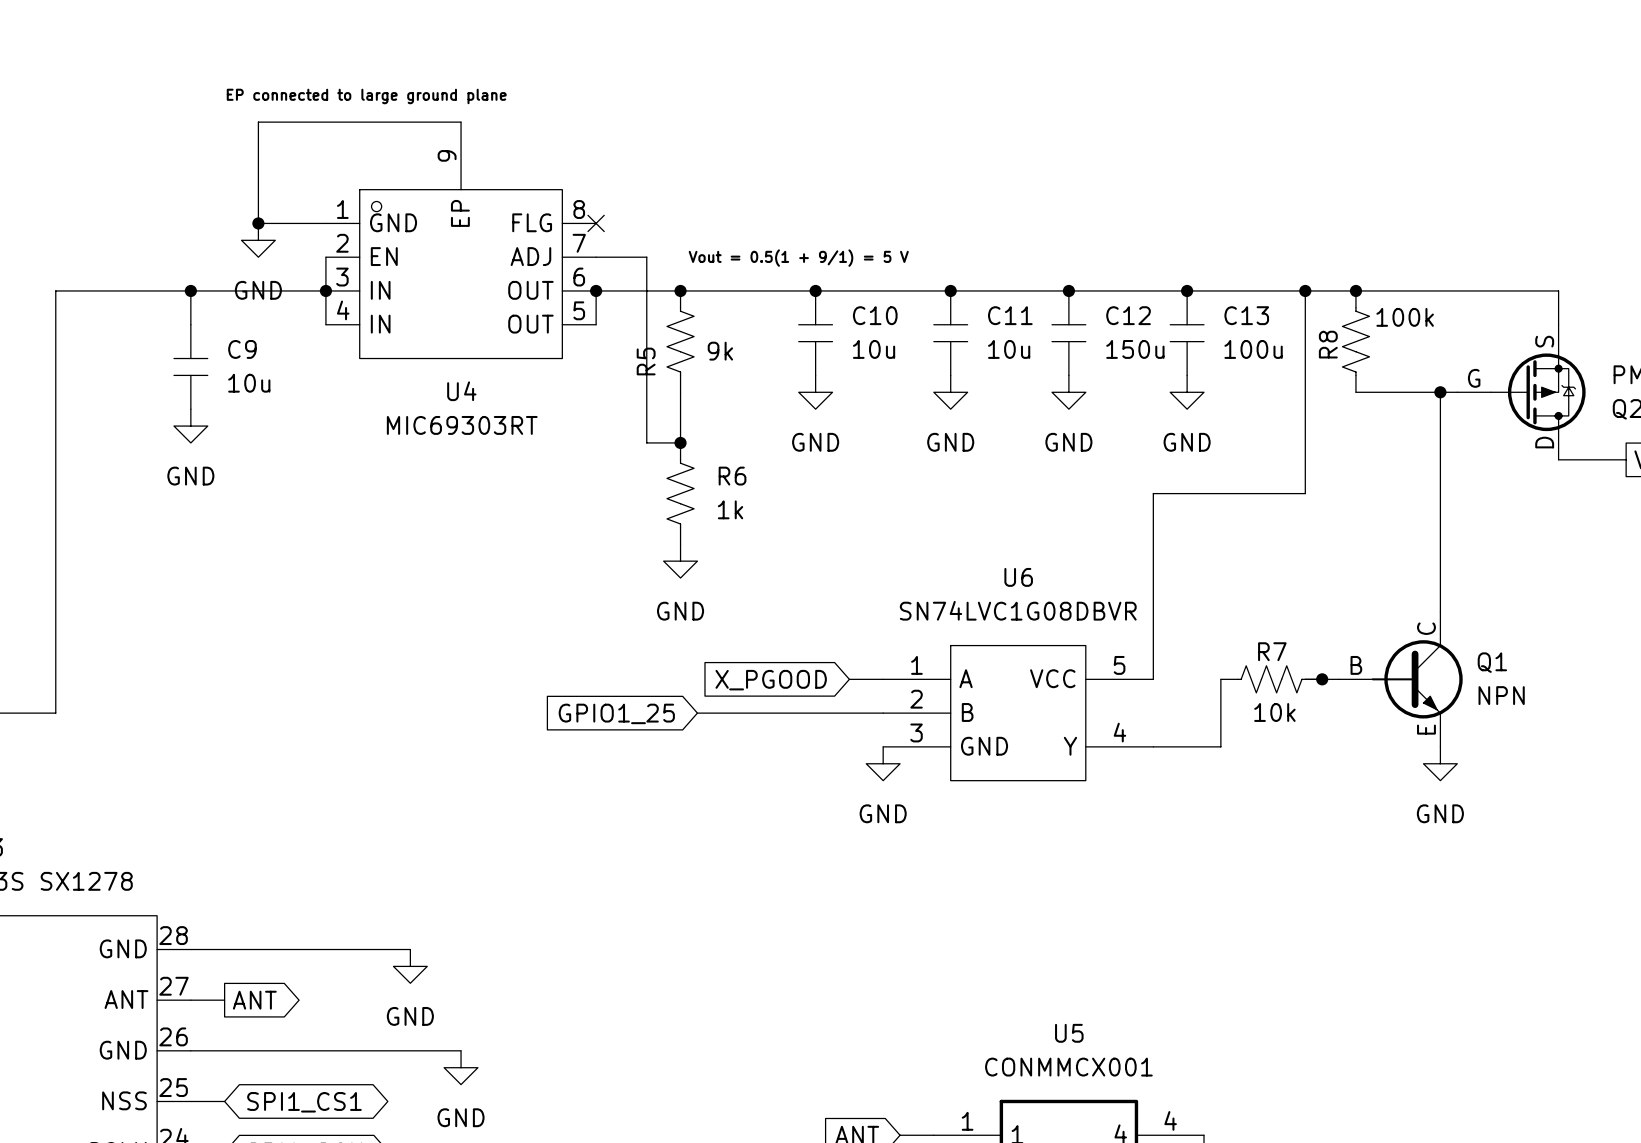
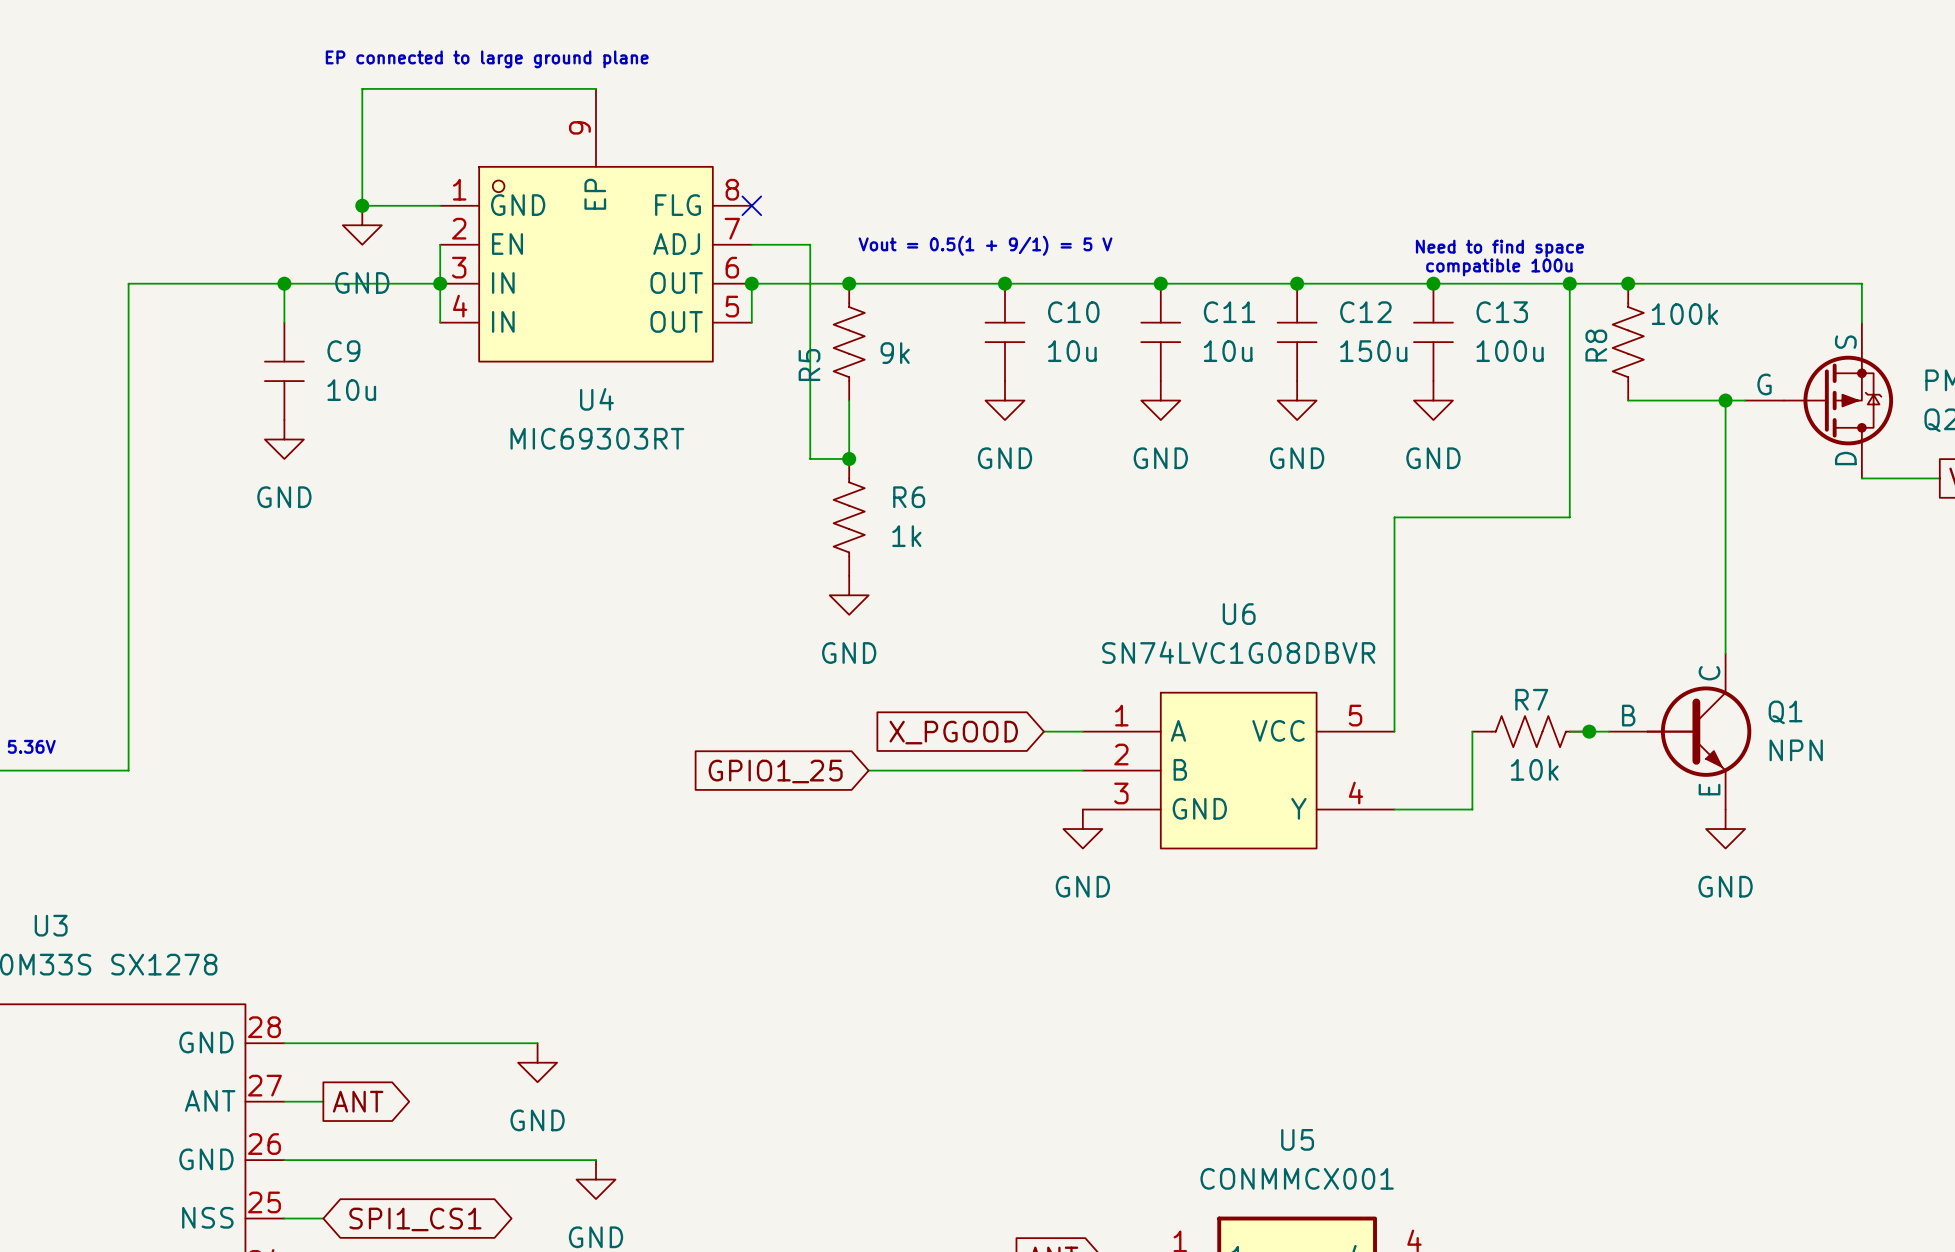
text: none -> Need to find space (1499, 248)
text: none -> compatible 100u (1499, 267)

